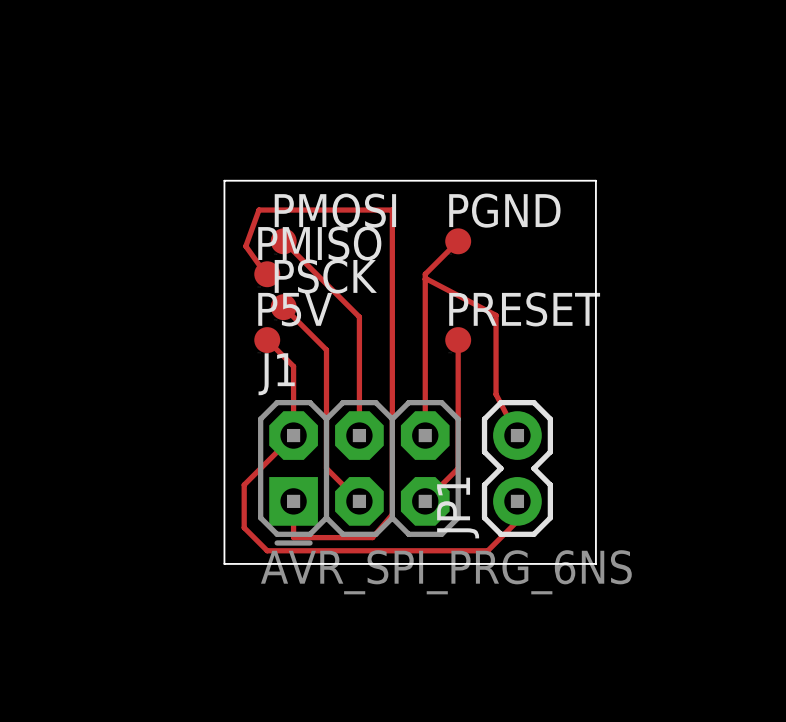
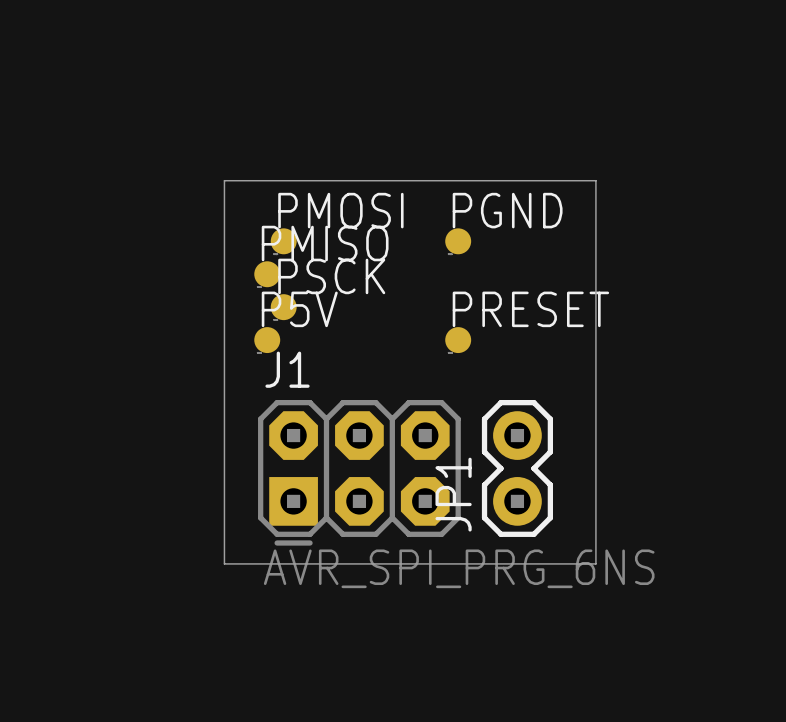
track: (283, 241) (359, 317) (359, 435) -> none
track: (458, 241) (425, 274) (425, 435) -> none
track: (267, 274) (245, 246) (259, 210) (392, 210) (392, 514) (372, 537) (293, 537) (293, 501) -> none
track: (425, 279) (496, 315) (496, 394) (517, 435) -> none
track: (283, 307) (326, 349) (326, 468) (359, 501) -> none
track: (267, 340) (293, 366) (293, 435) (244, 484) (244, 527) (267, 550) (487, 550) (517, 521) (517, 501) -> none
track: (458, 340) (458, 468) (425, 501) -> none

